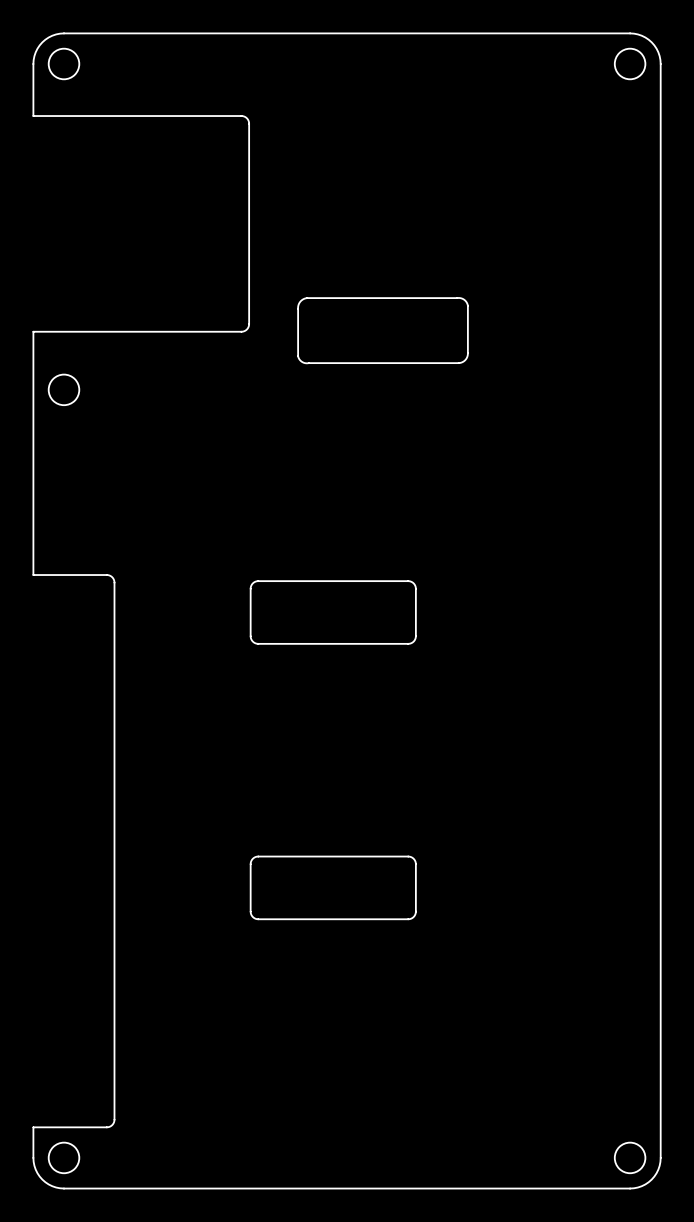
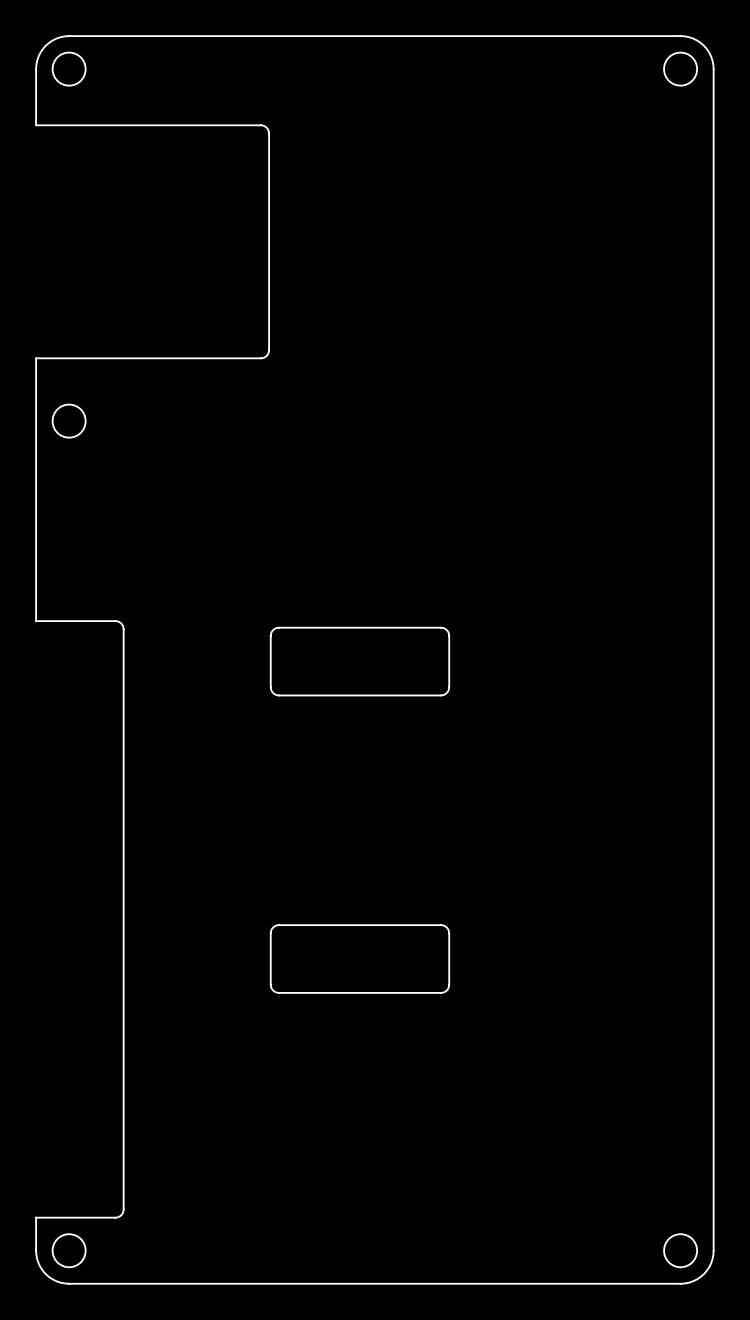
board edge: (457, 298) (304, 298) (300, 301) (298, 307) (298, 357) (306, 363) (461, 362) (465, 360) (467, 354) (467, 305) (464, 299) (457, 298) -> none

